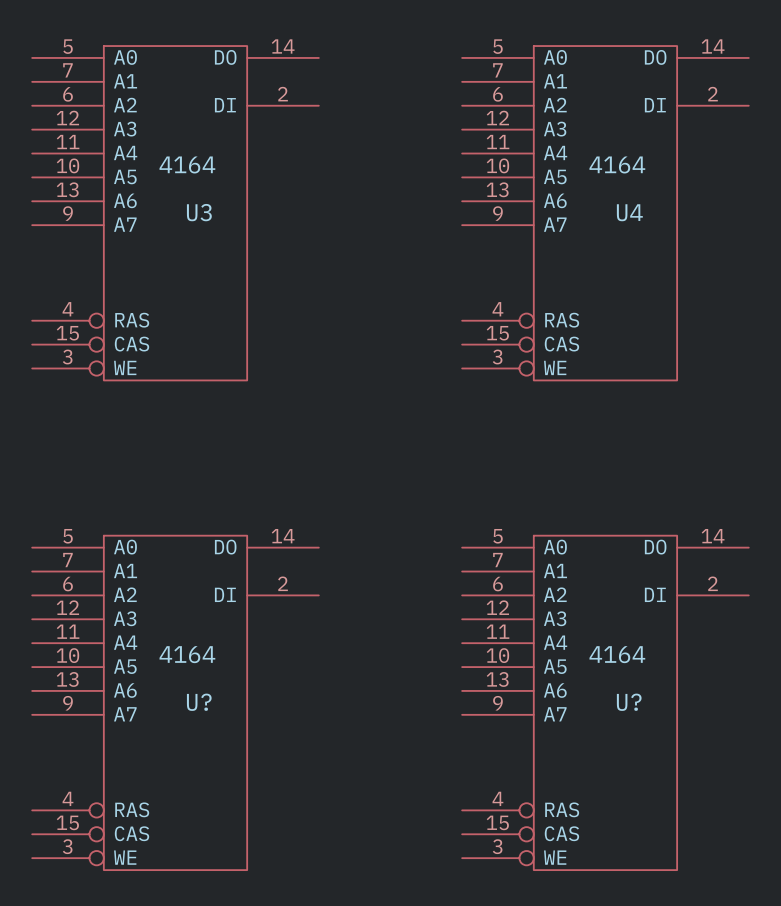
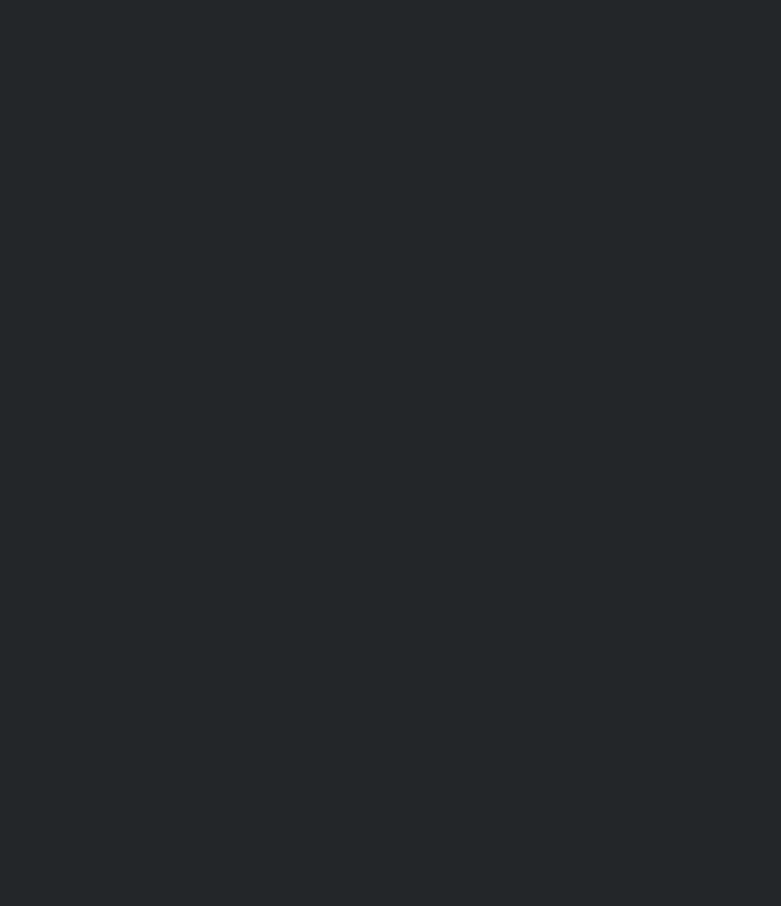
U3: 4164 (175, 213) -> none
U4: 4164 (605, 213) -> none
U?: 4164 (175, 702) -> none
U?: 4164 (605, 702) -> none

